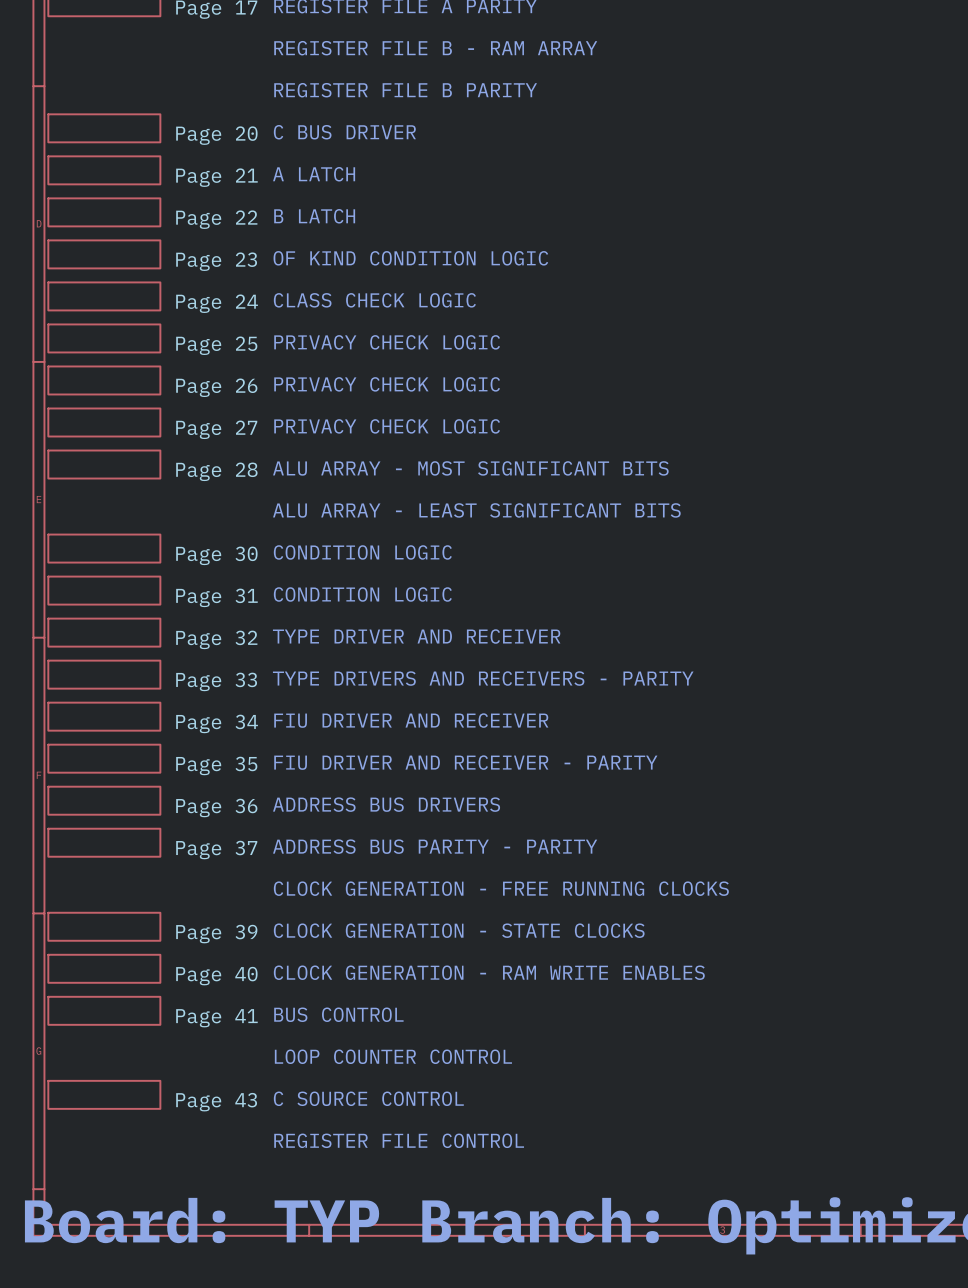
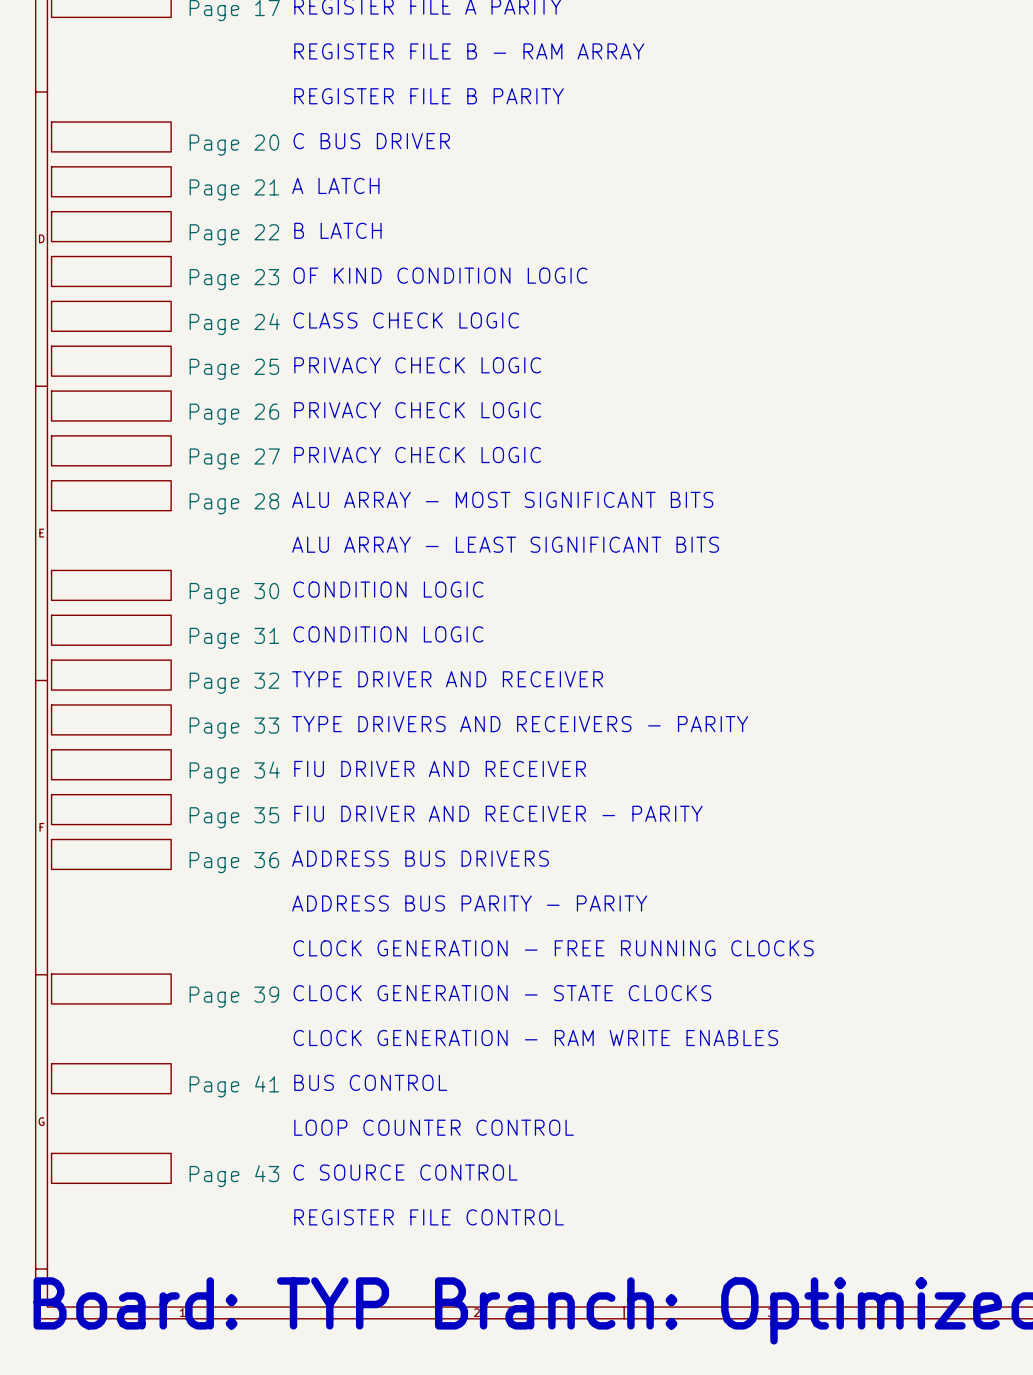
sheet Page 37: (104, 842) -> none
sheet Page 40: (104, 968) -> none

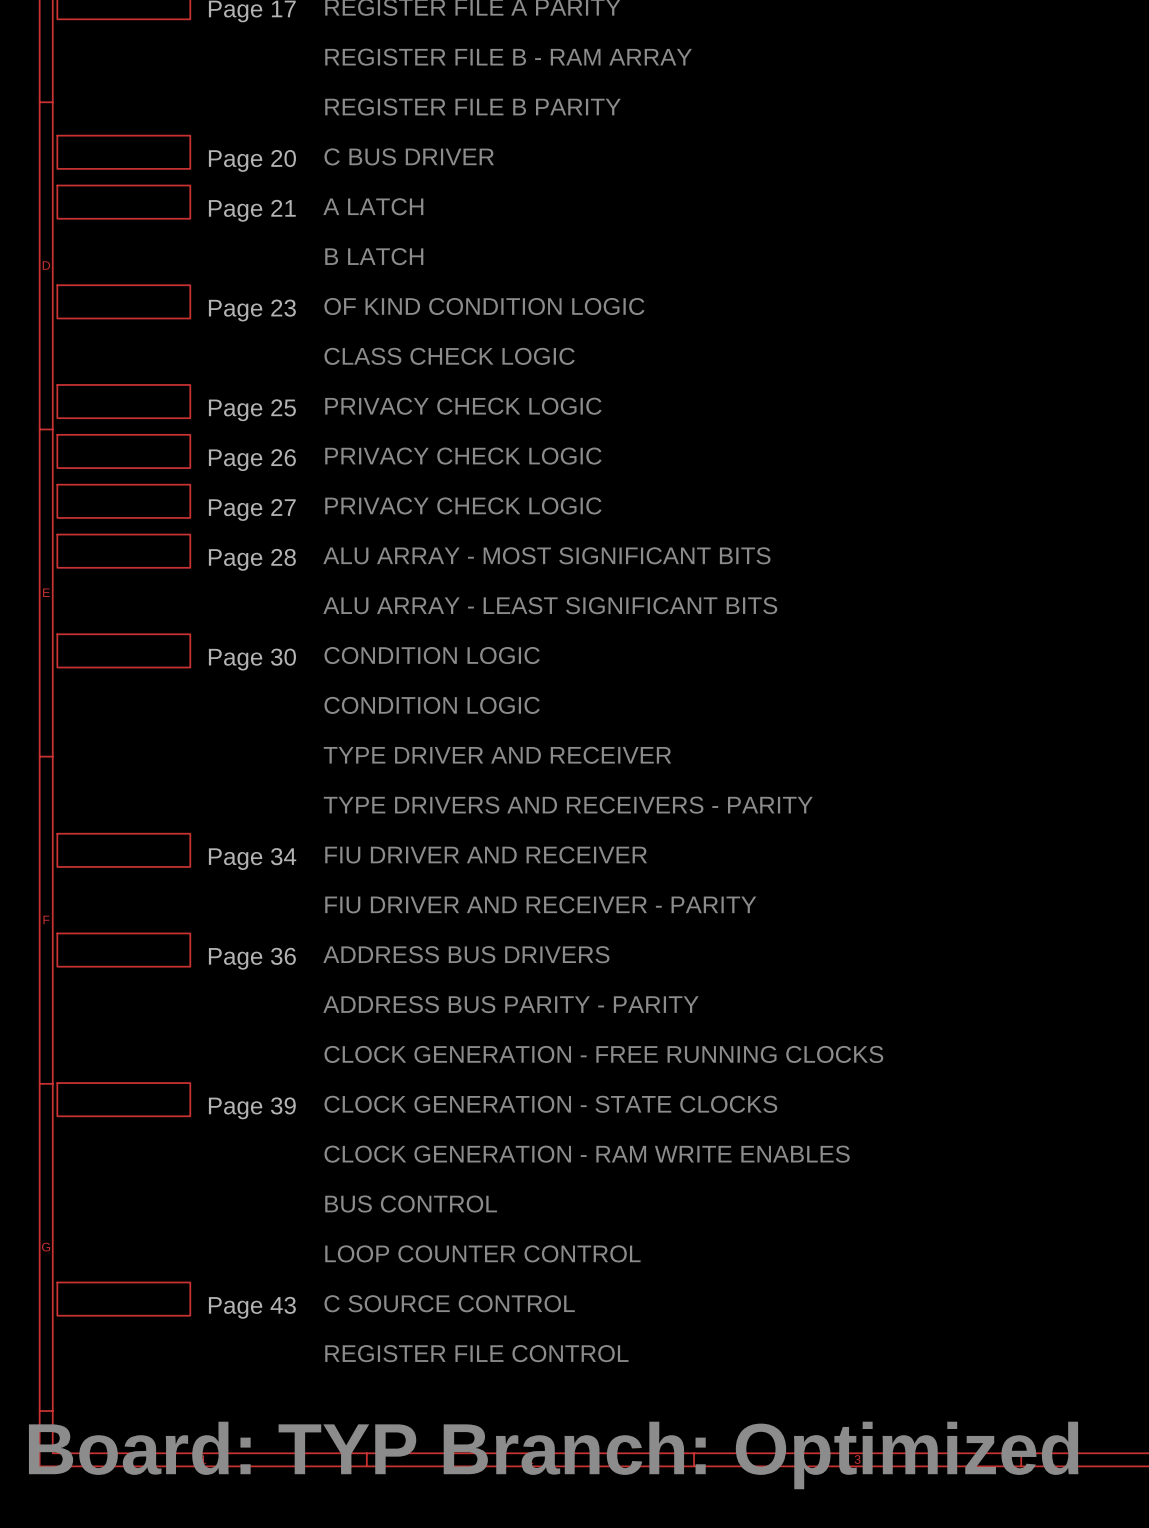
sheet Page 22: (111, 226) -> none
sheet Page 24: (111, 316) -> none
sheet Page 31: (111, 630) -> none
sheet Page 32: (111, 675) -> none
sheet Page 33: (111, 719) -> none
sheet Page 35: (111, 809) -> none
sheet Page 41: (111, 1078) -> none

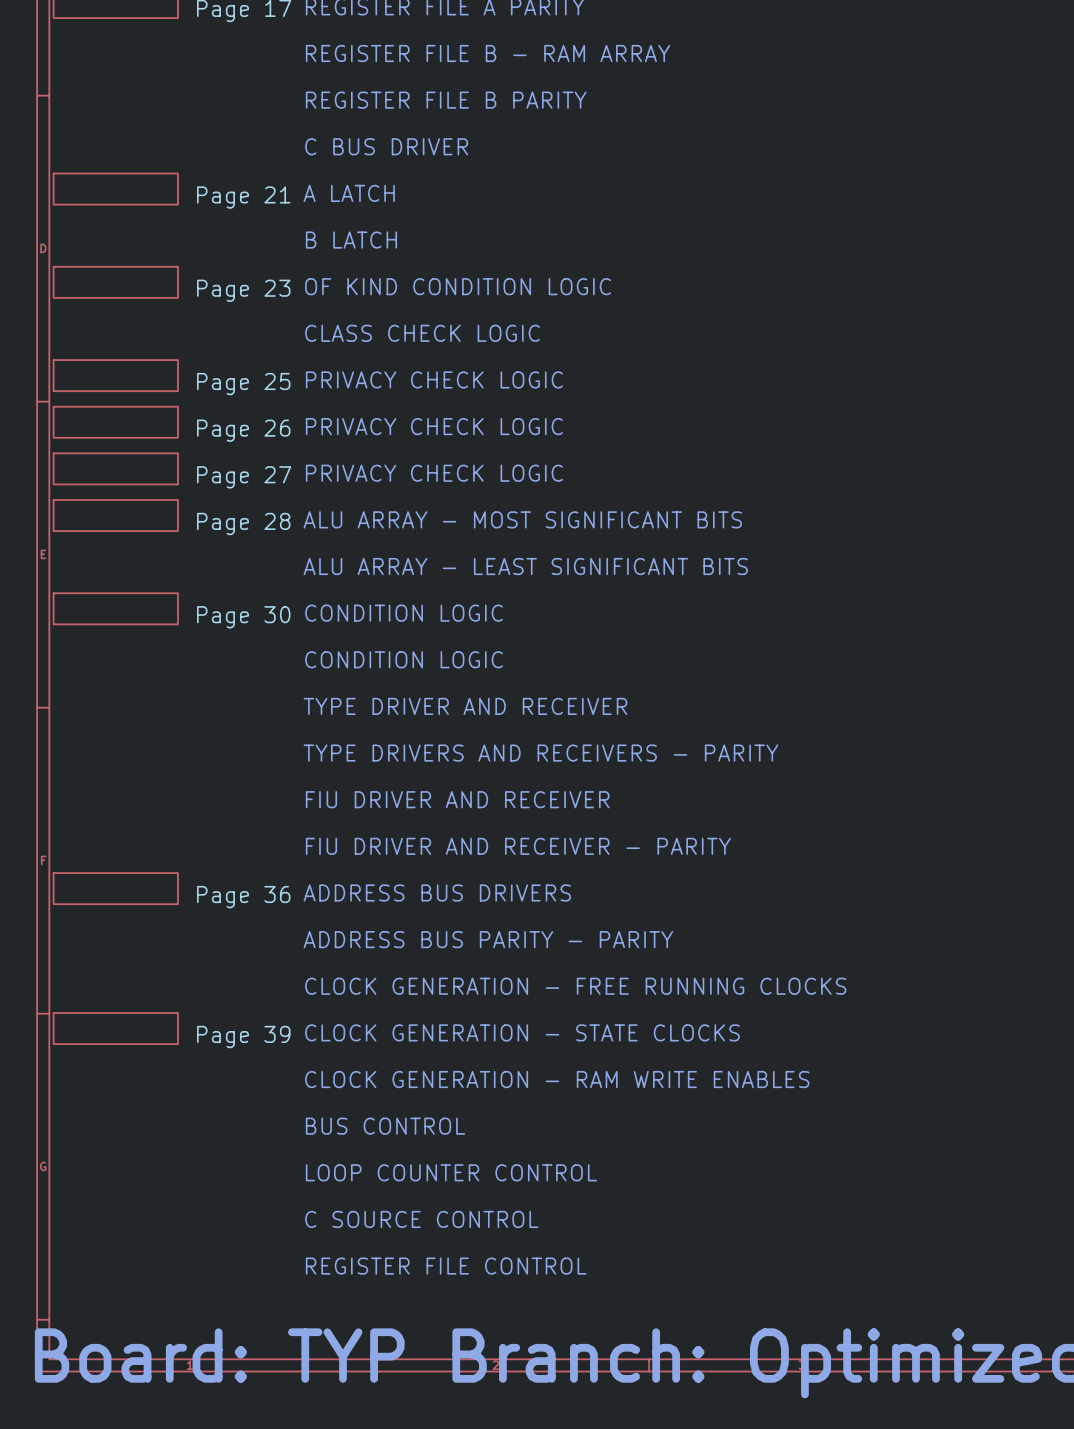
sheet Page 20: (123, 152) -> none
sheet Page 34: (123, 850) -> none
sheet Page 43: (123, 1299) -> none

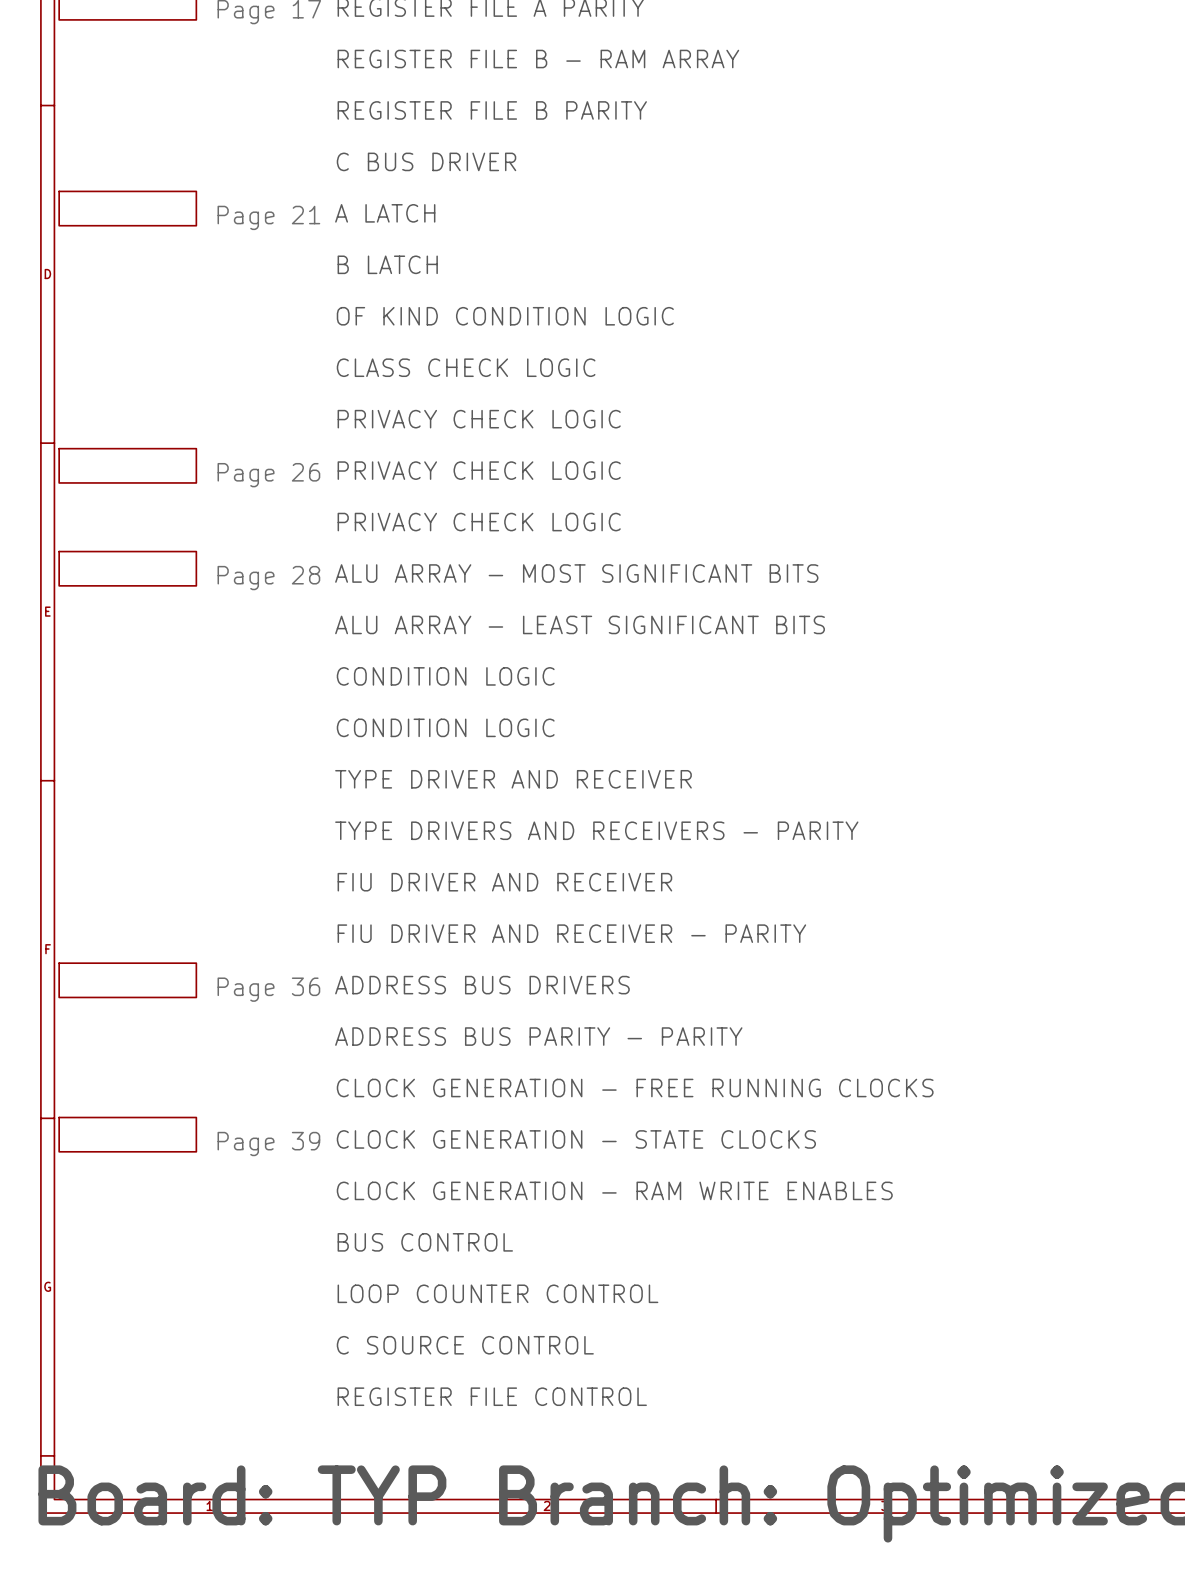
sheet Page 23: (115, 282) -> none
sheet Page 25: (115, 375) -> none
sheet Page 27: (115, 468) -> none
sheet Page 30: (115, 608) -> none

